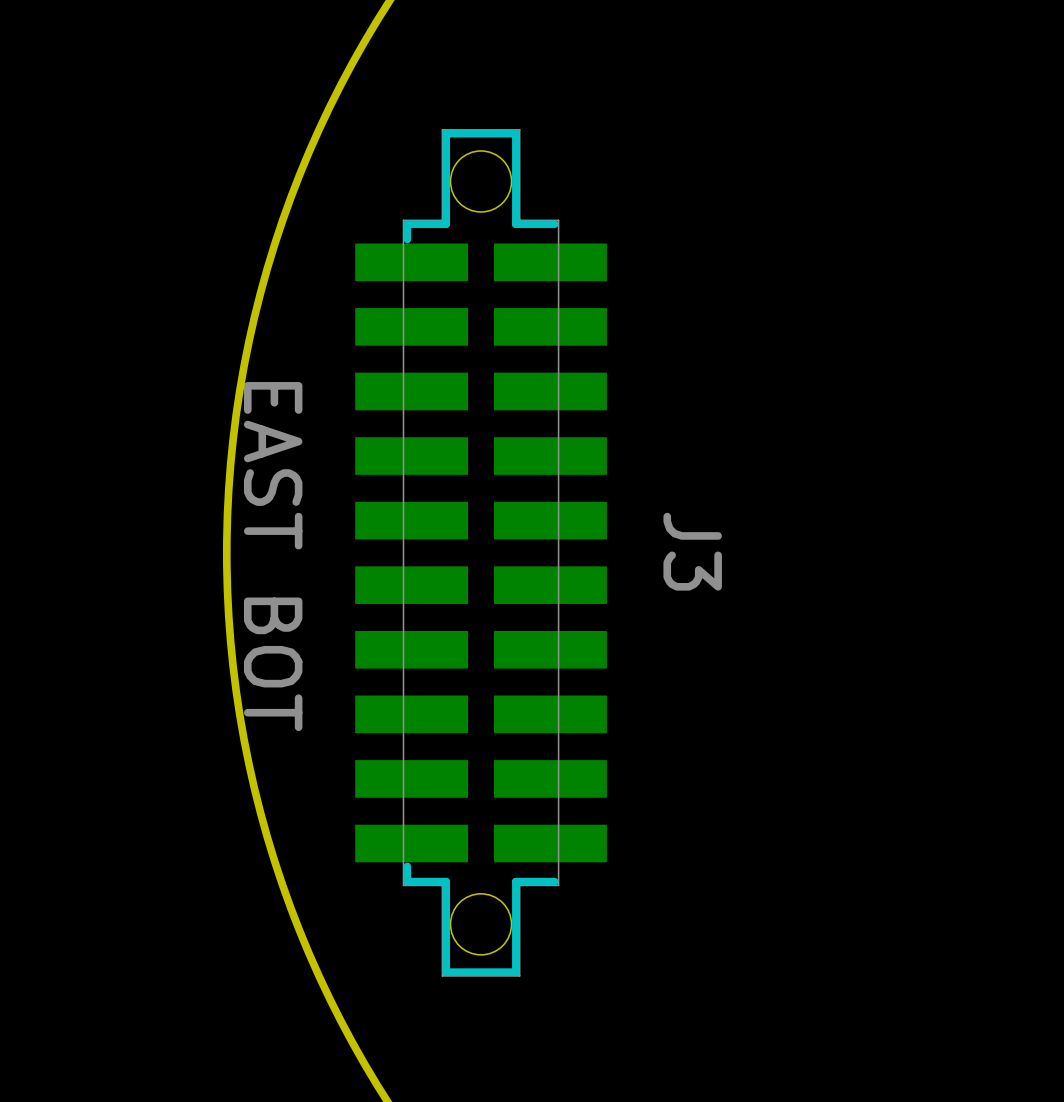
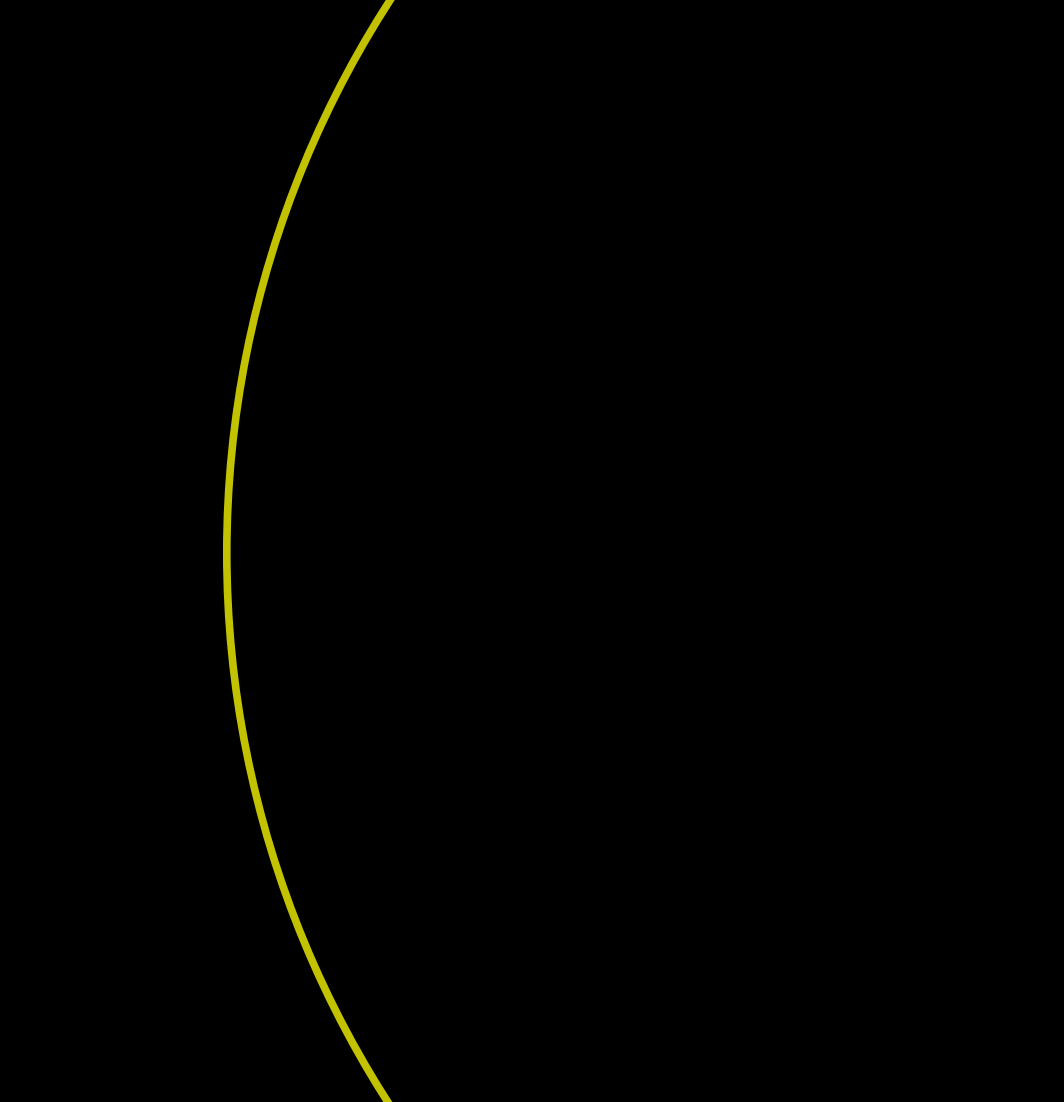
J3: EAST BOT (481, 552) -> none

